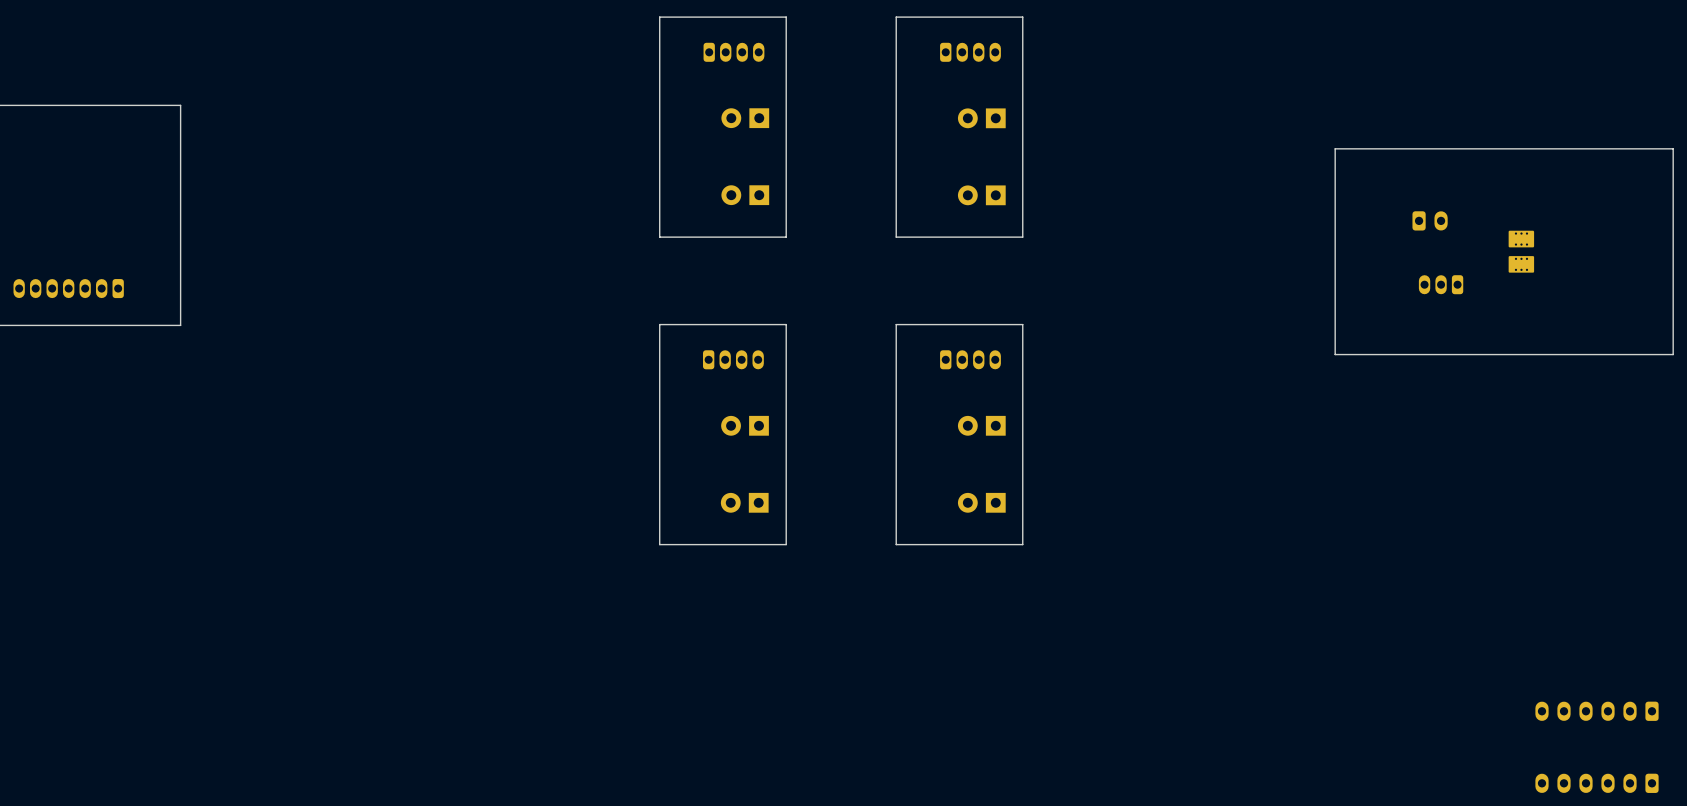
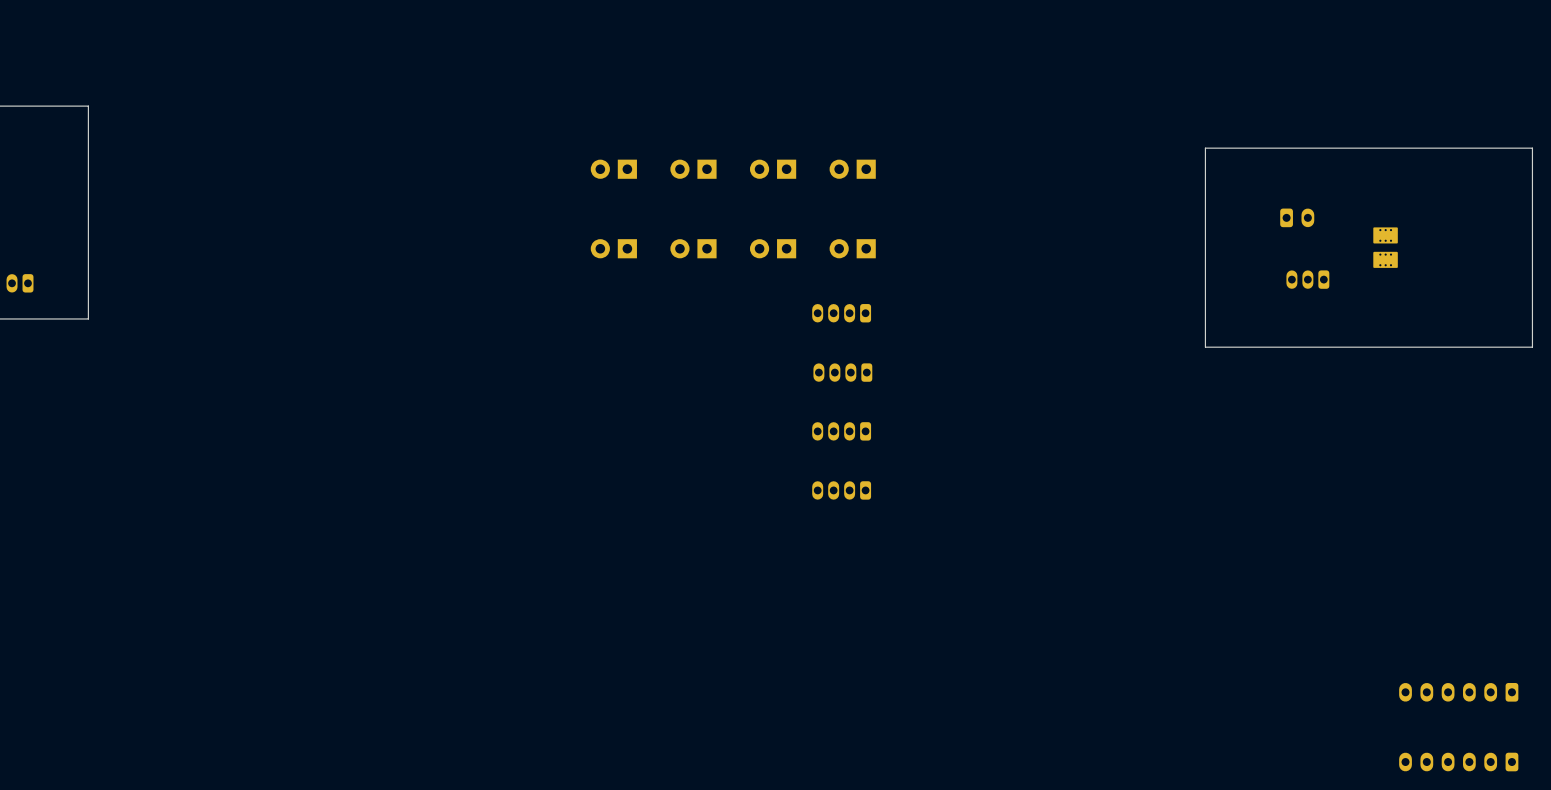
board edge: (786, 17) (659, 17) (659, 237) (786, 237) (786, 17) -> none
board edge: (1022, 17) (1022, 237) (896, 237) (896, 17) (1022, 17) -> none
part: (733, 52) -> none
part: (970, 52) -> none
part: (745, 118) -> none
part: (981, 118) -> none
part: none -> (613, 169)
part: none -> (693, 169)
part: none -> (773, 169)
part: none -> (852, 169)
part: (745, 195) -> none
part: (981, 195) -> none
part: none -> (613, 248)
part: none -> (693, 248)
part: none -> (773, 248)
part: none -> (852, 248)
part: none -> (841, 313)
board edge: (786, 324) (659, 324) (659, 544) (786, 544) (786, 324) -> none
board edge: (1022, 324) (896, 324) (896, 544) (1022, 544) (1022, 324) -> none
part: (733, 359) -> none
part: (970, 359) -> none
part: none -> (842, 372)
part: (745, 425) -> none
part: (981, 425) -> none
part: none -> (841, 431)
part: (744, 502) -> none
part: none -> (841, 490)
part: (981, 502) -> none

